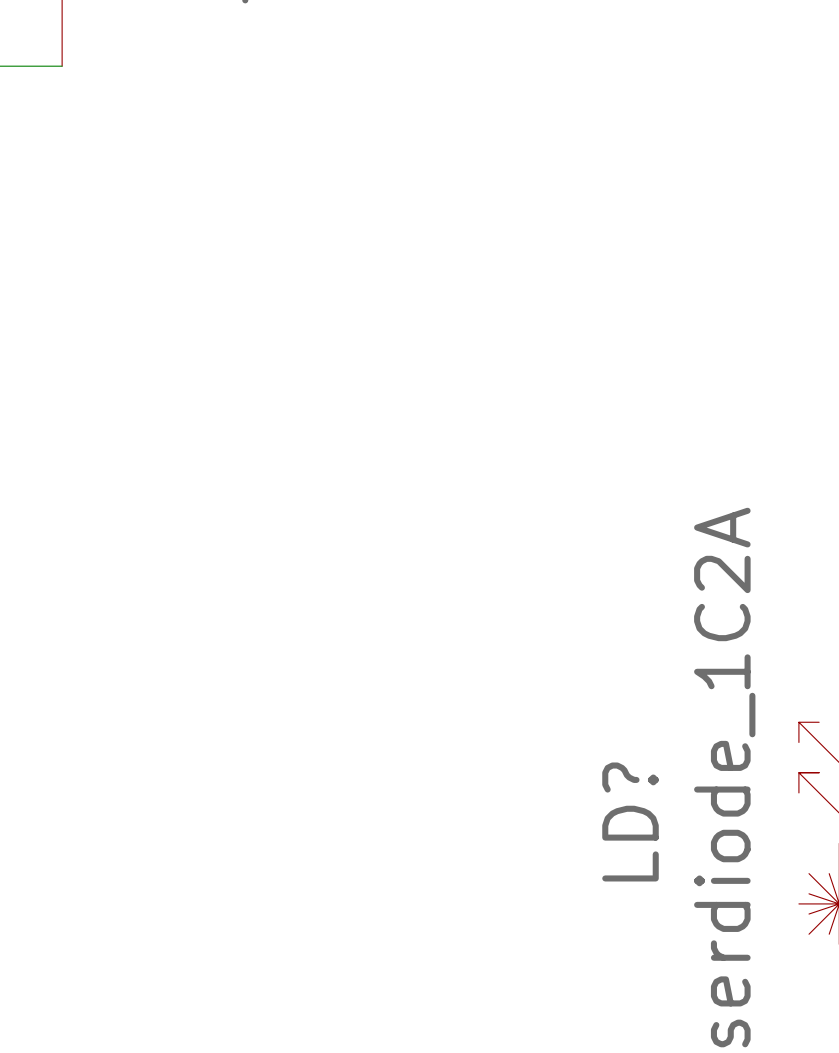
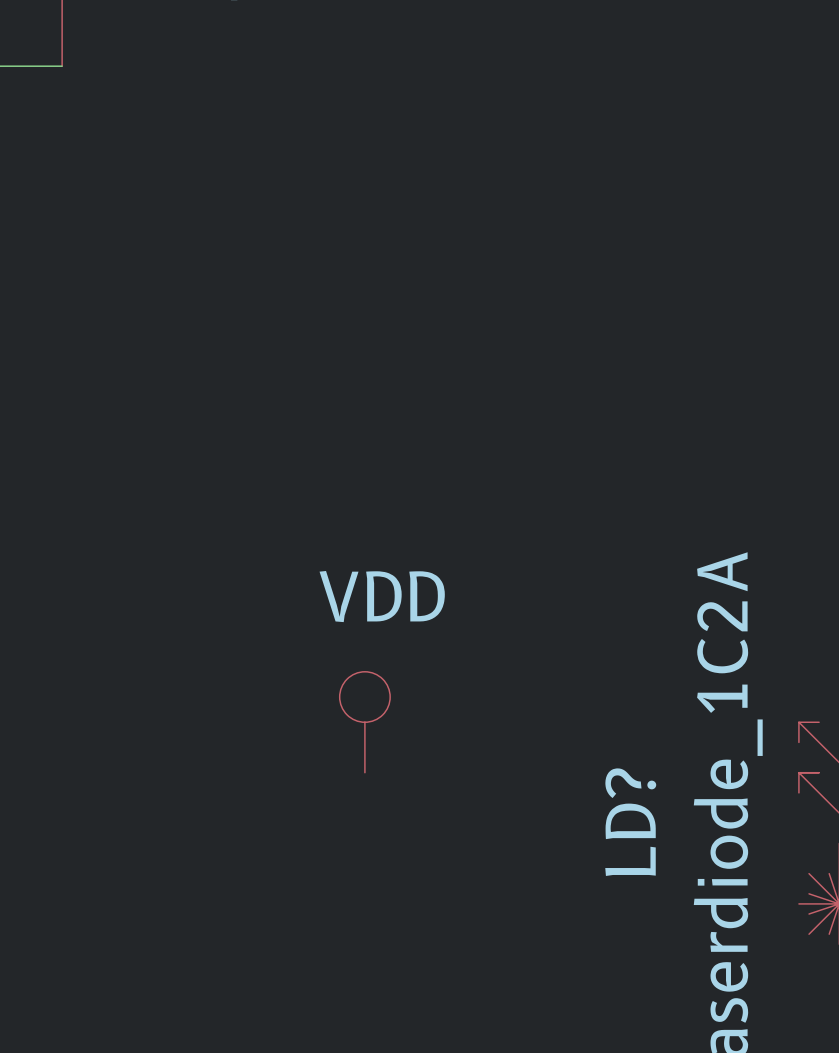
power symbol: none -> VDD (364, 722)

